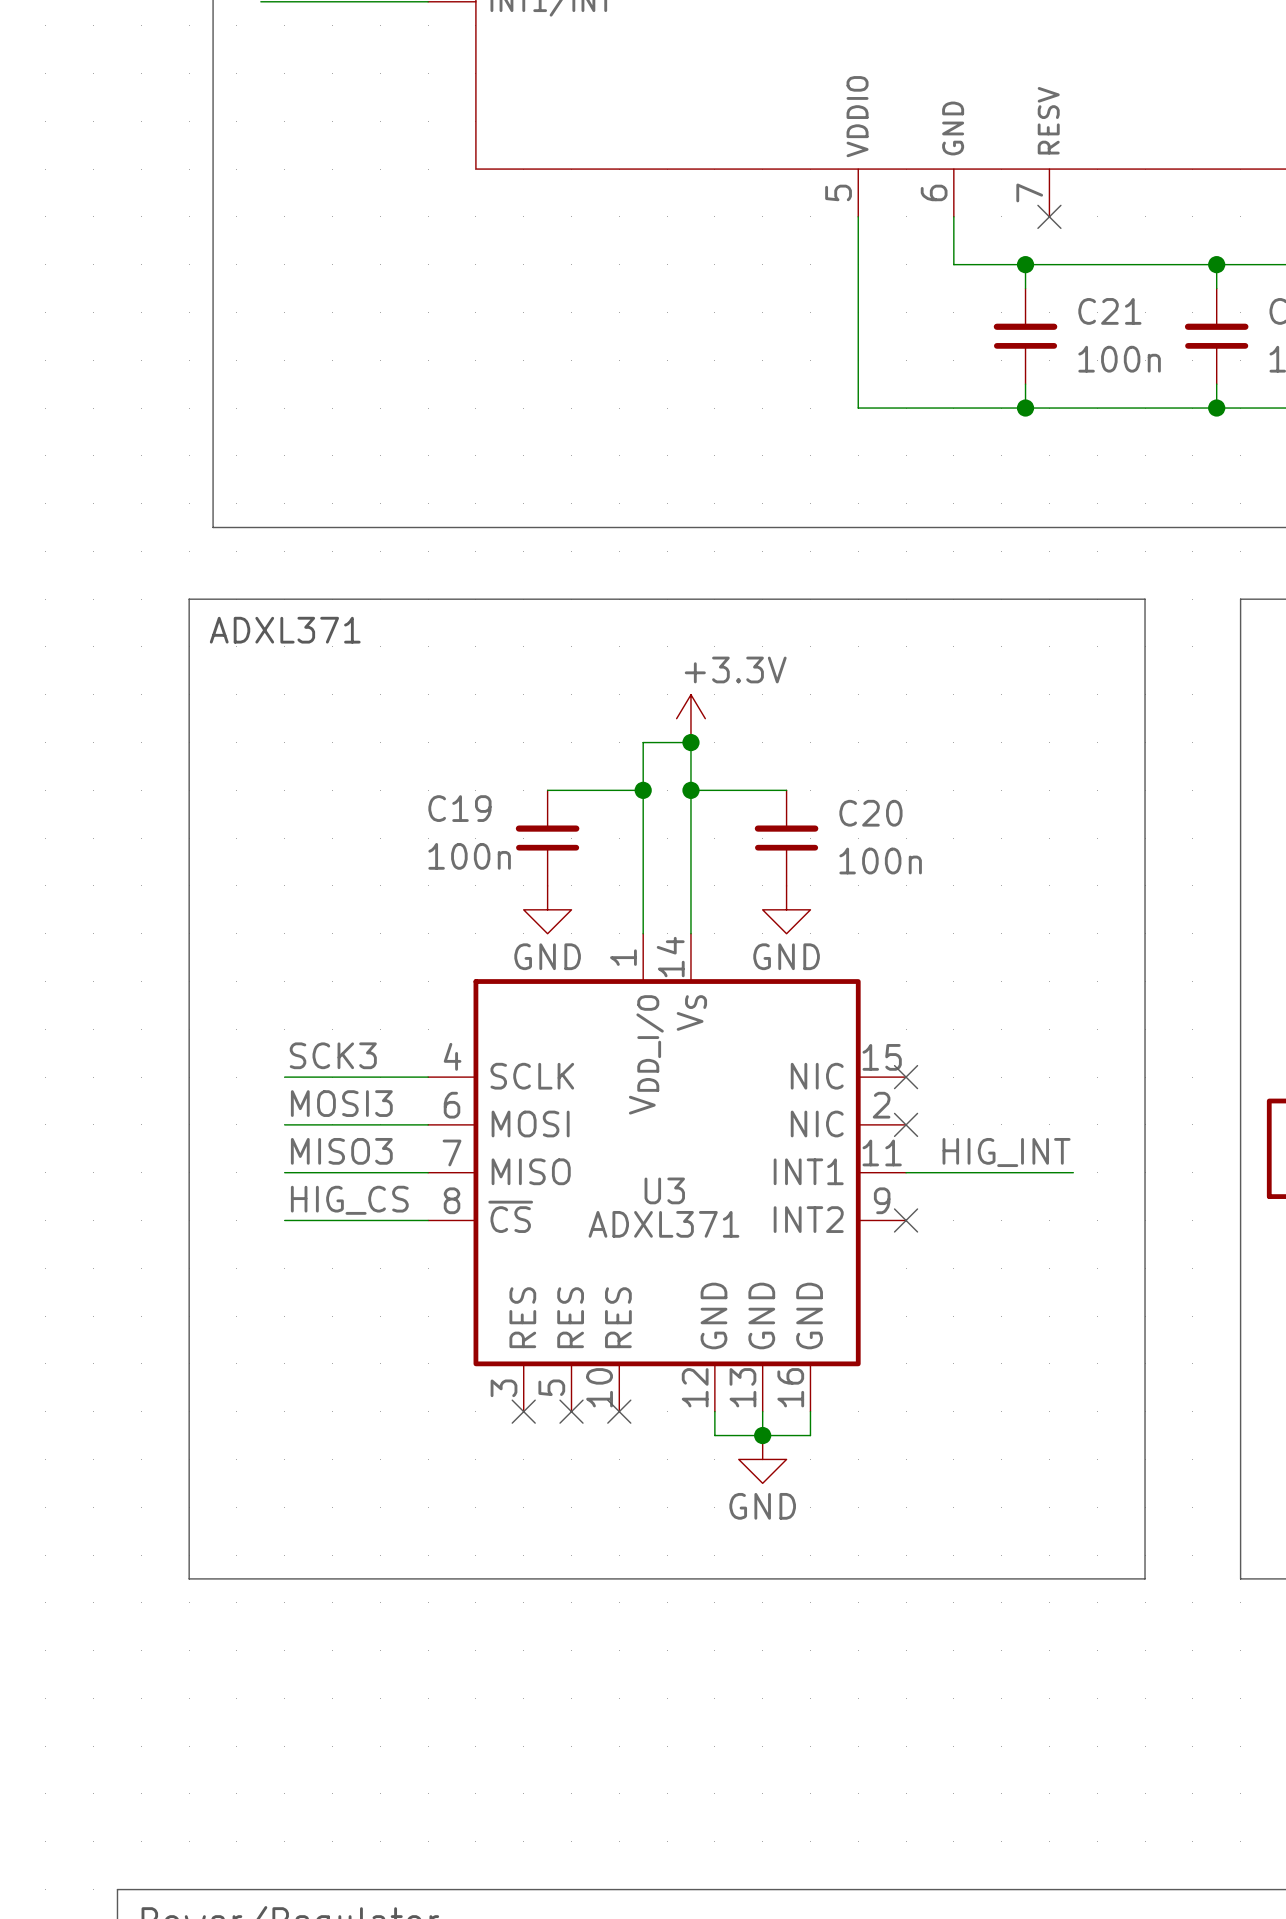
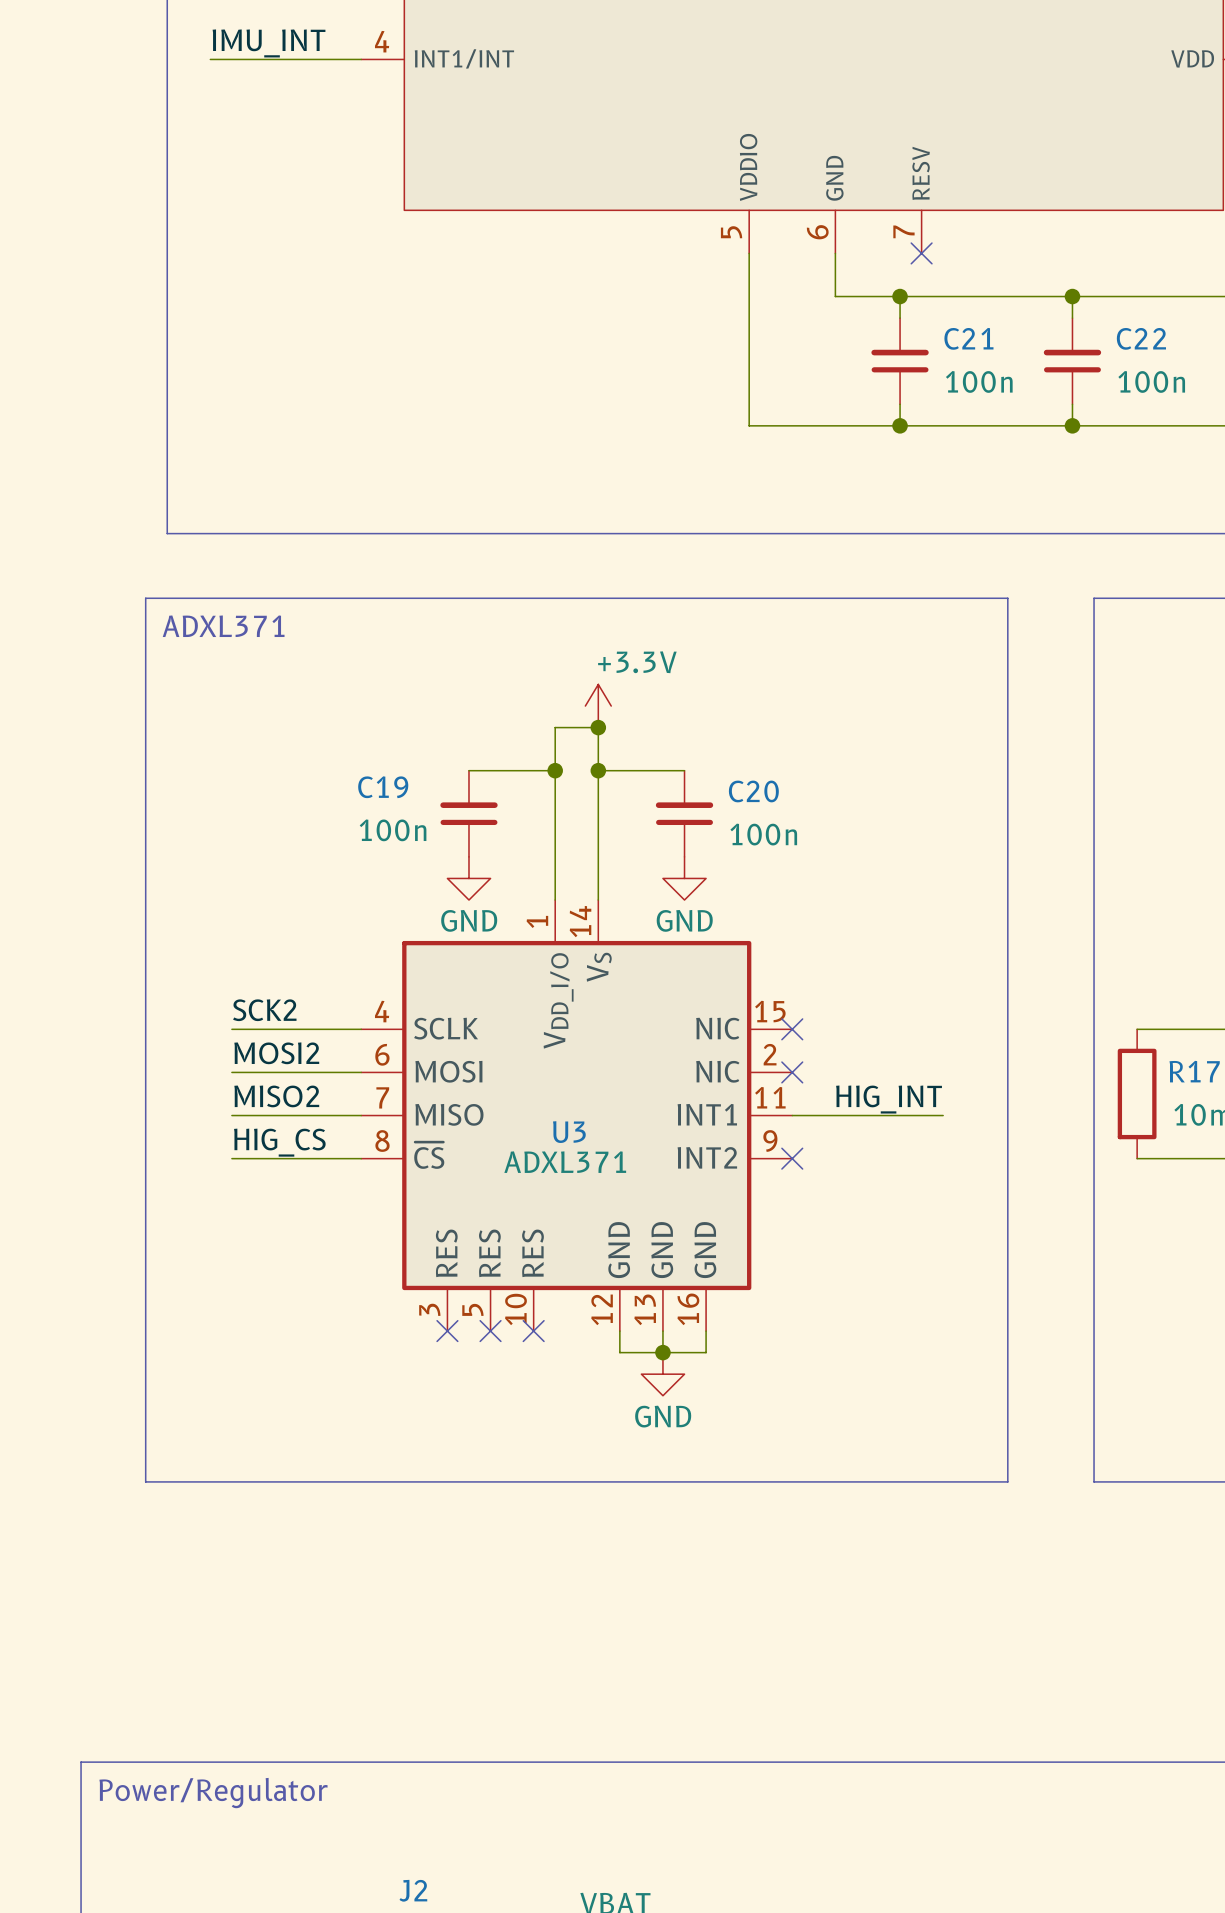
label: SCK3 (333, 1055) -> SCK2 (264, 1010)
label: MOSI3 (341, 1103) -> MOSI2 (276, 1053)
label: MISO3 (341, 1151) -> MISO2 (276, 1096)

